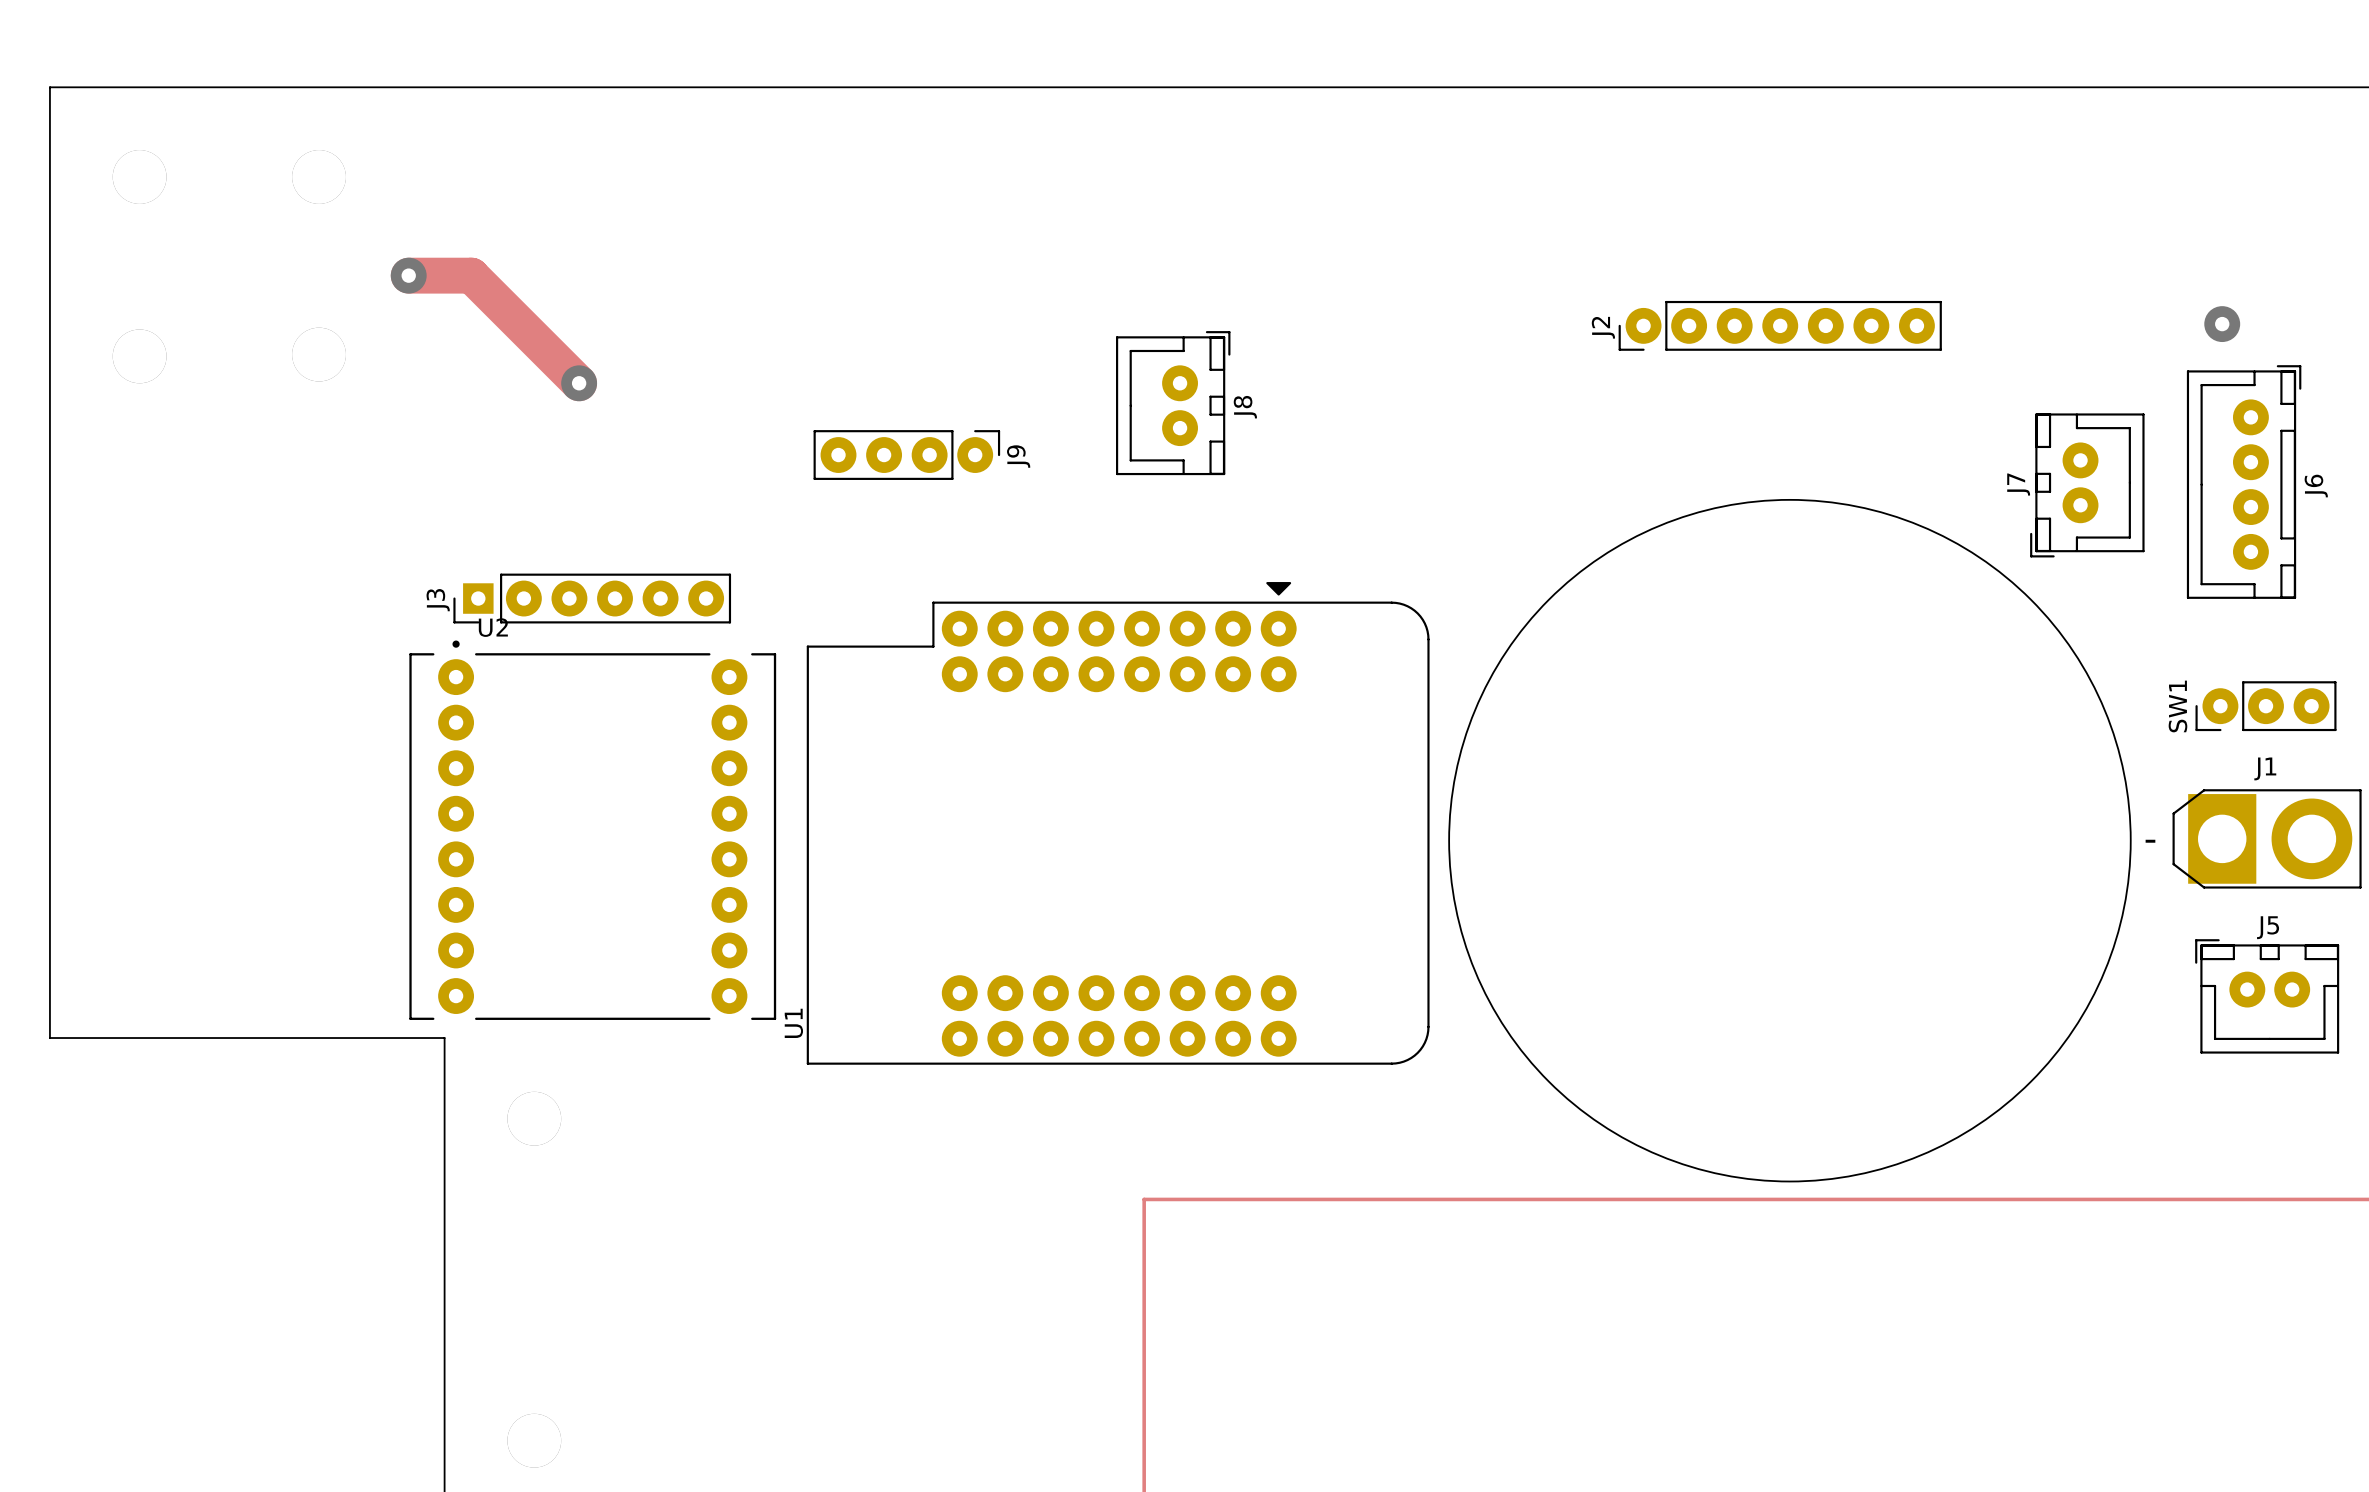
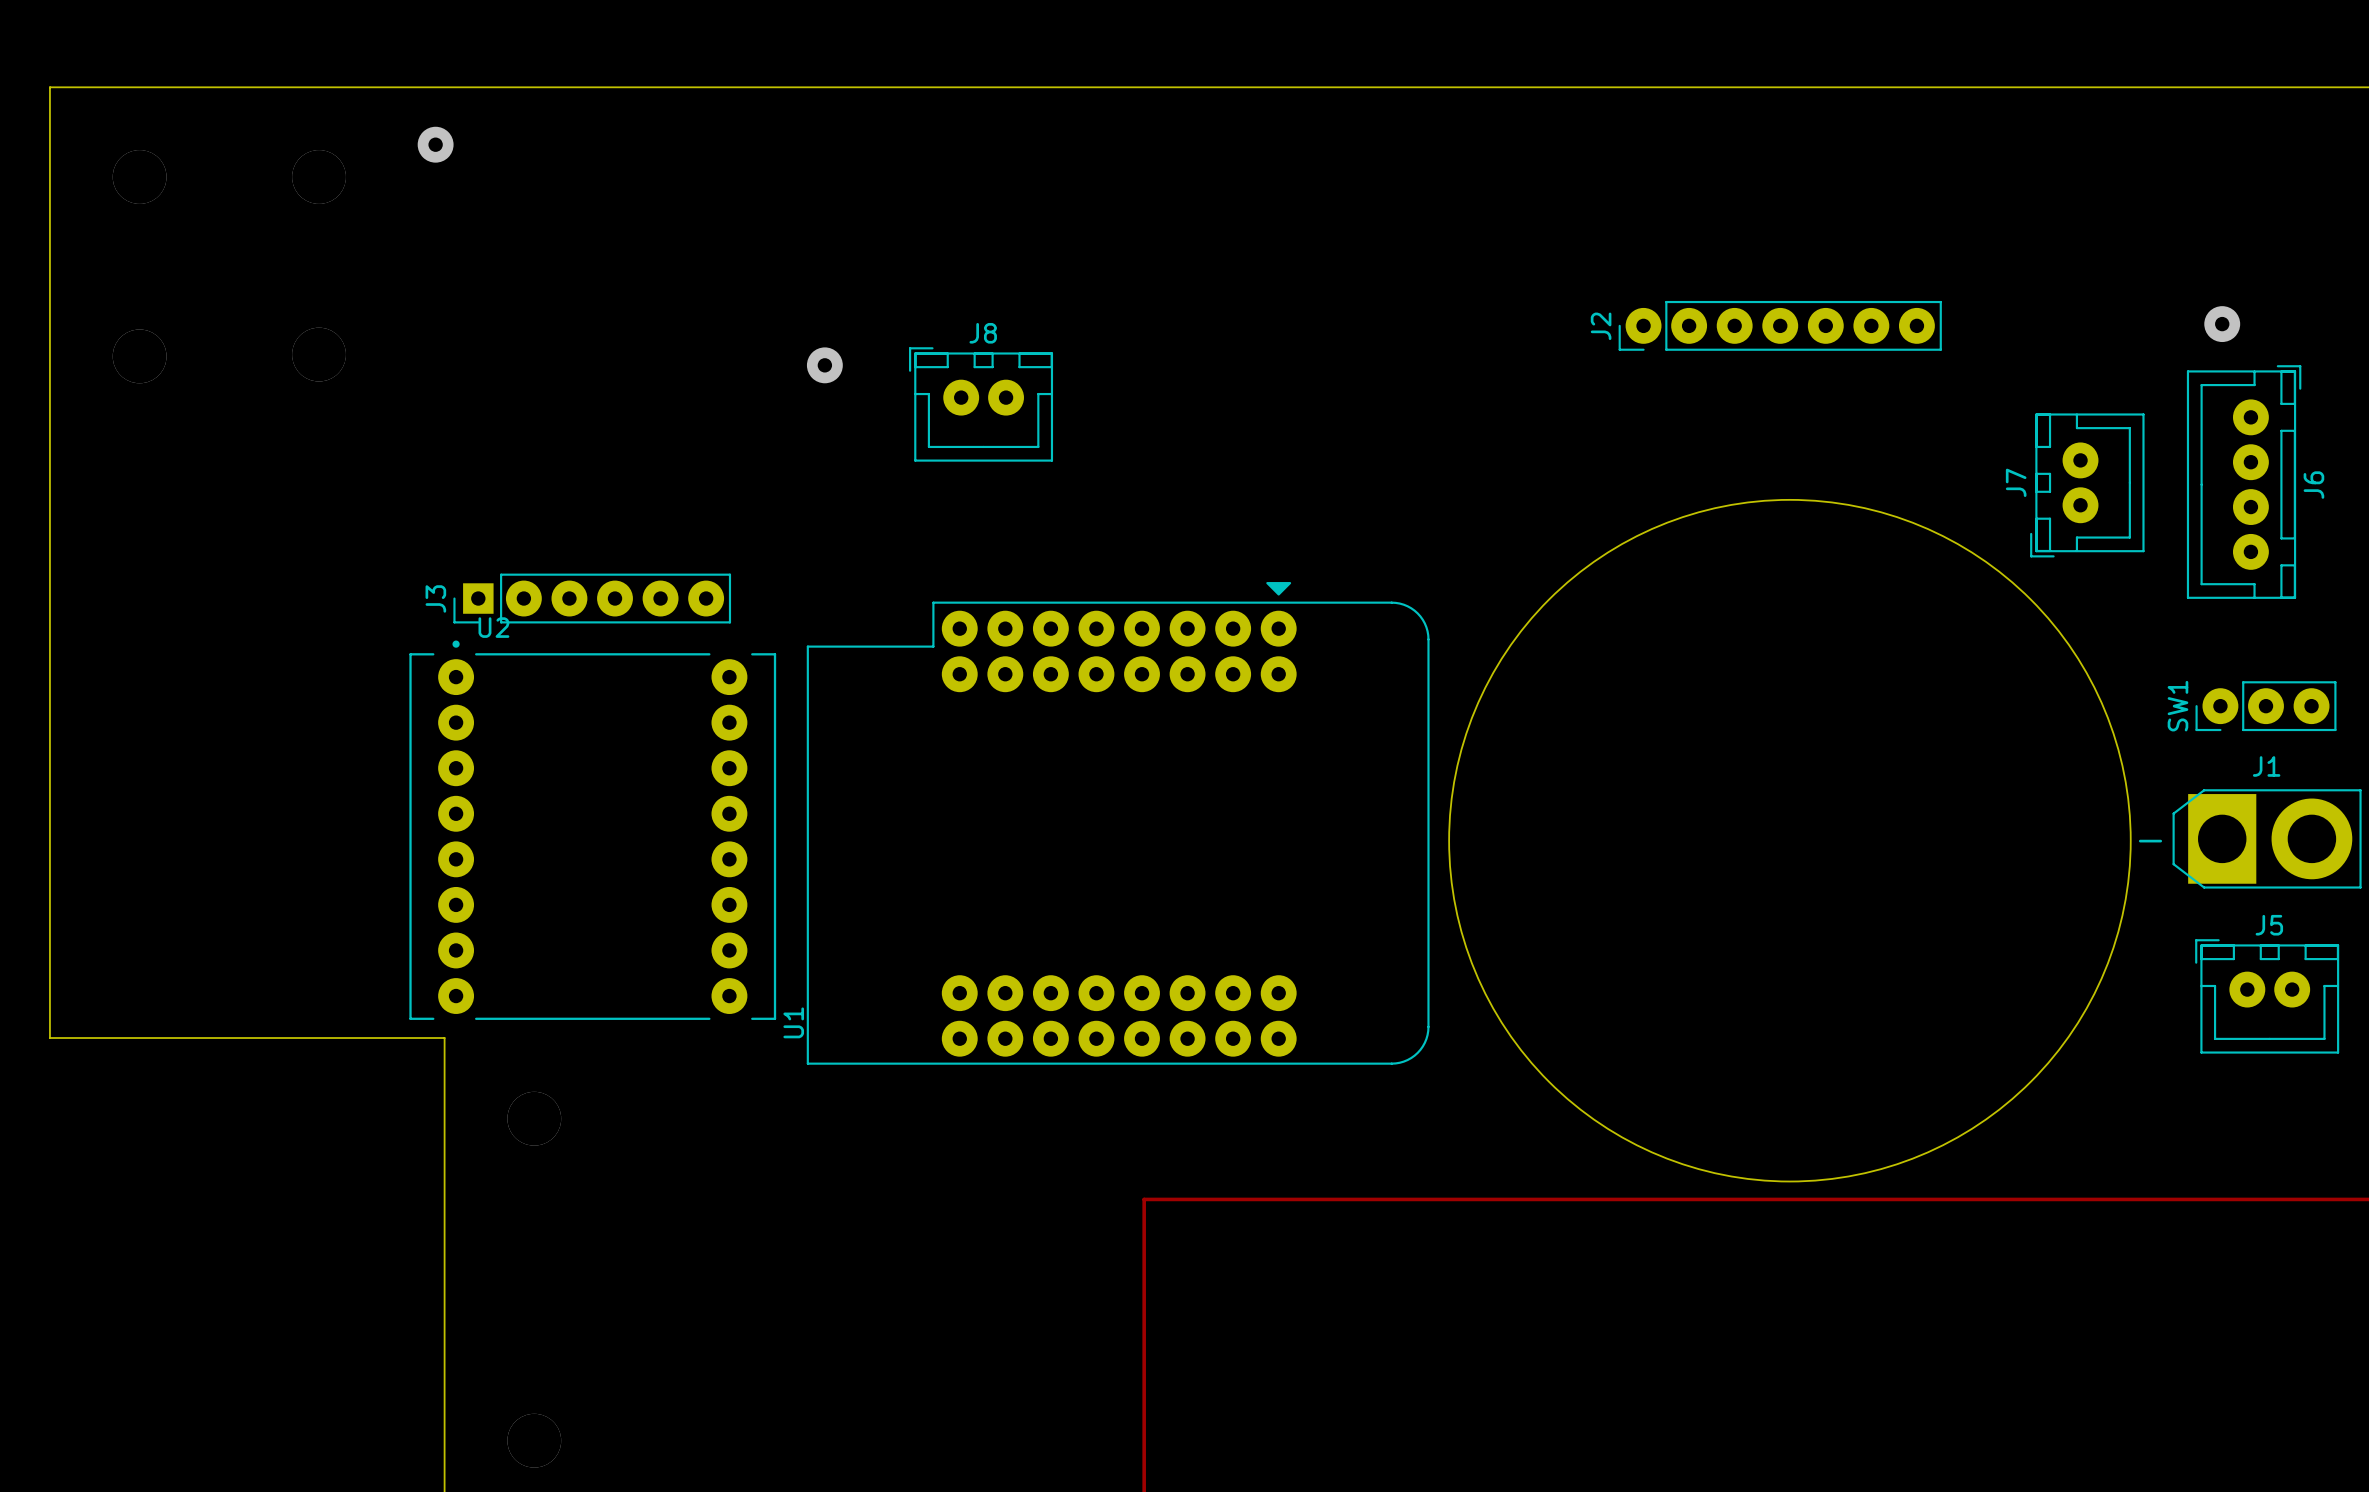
via: none -> (435, 144)
track: (408, 275) (471, 275) (579, 383) -> none
via: (408, 275) -> none
via: none -> (824, 365)
via: (579, 383) -> none
J8 rotation: 0° (1173, 403) -> 90° counterclockwise (981, 404)
J8 position: (1173, 403) -> (981, 404)
J9: (906, 455) -> none

